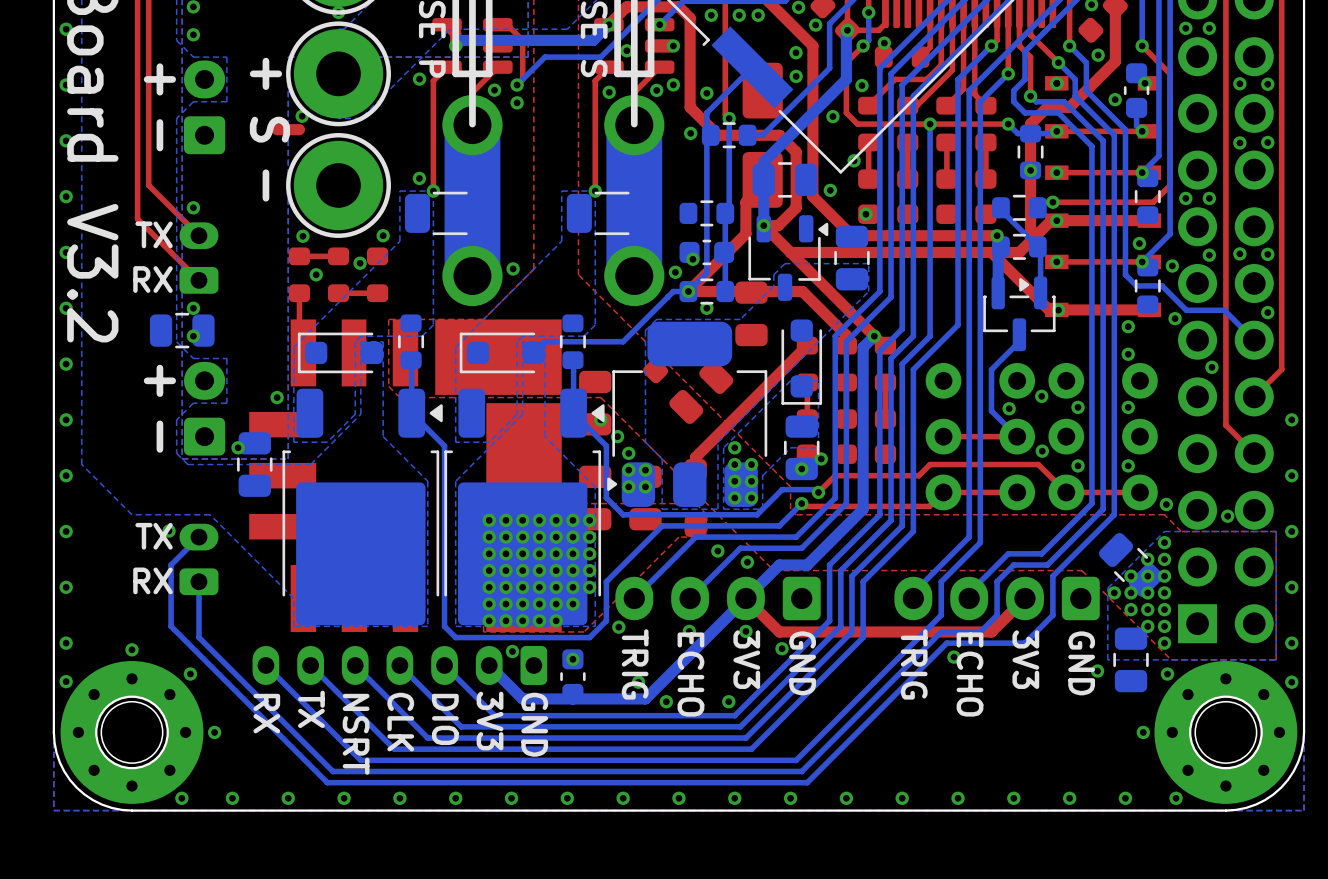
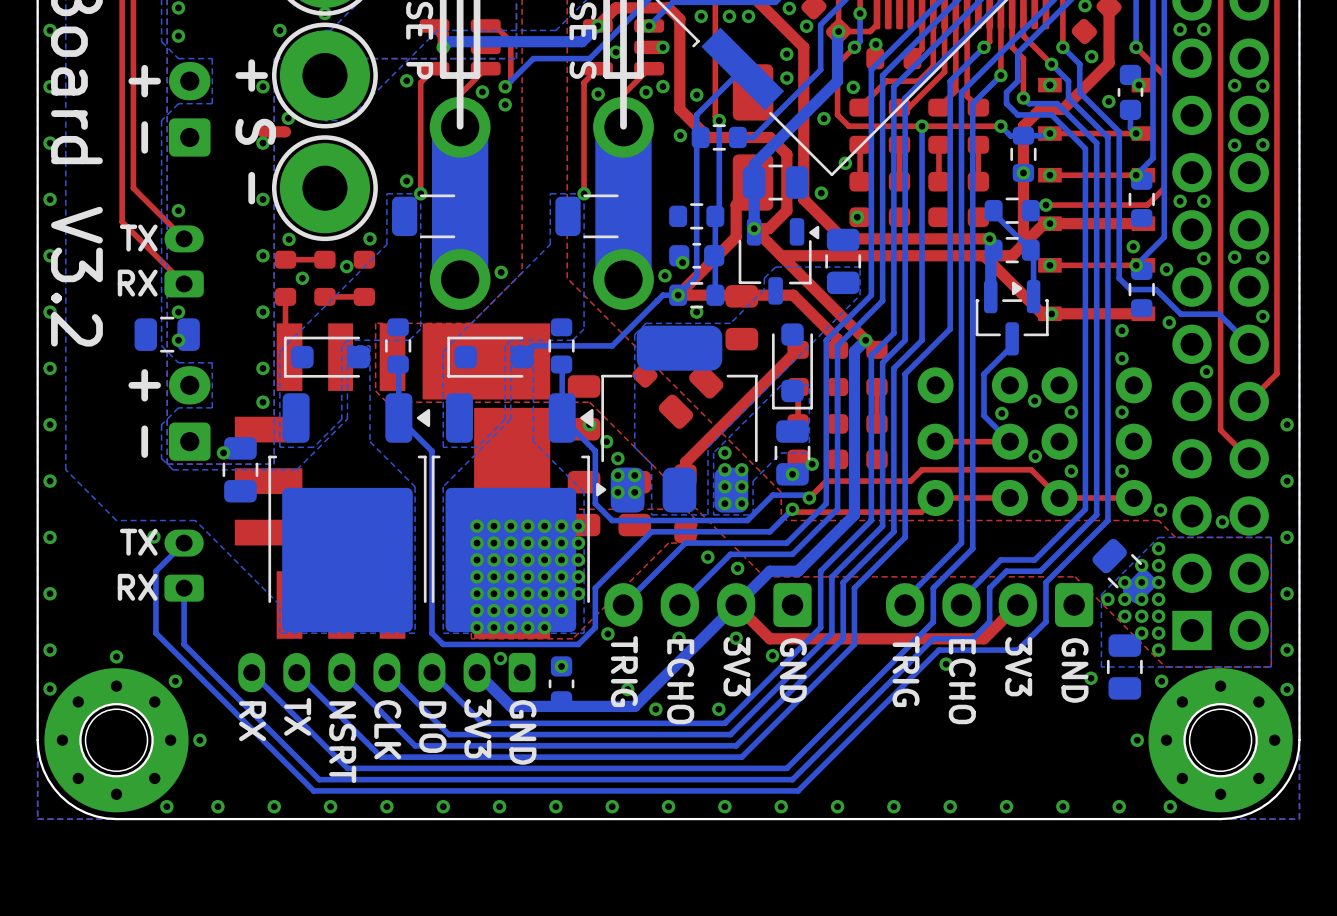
via: none -> (279, 30)
via: none -> (262, 86)
via: none -> (262, 143)
via: none -> (262, 199)
via: none -> (262, 255)
via: none -> (262, 312)
via: none -> (262, 368)

